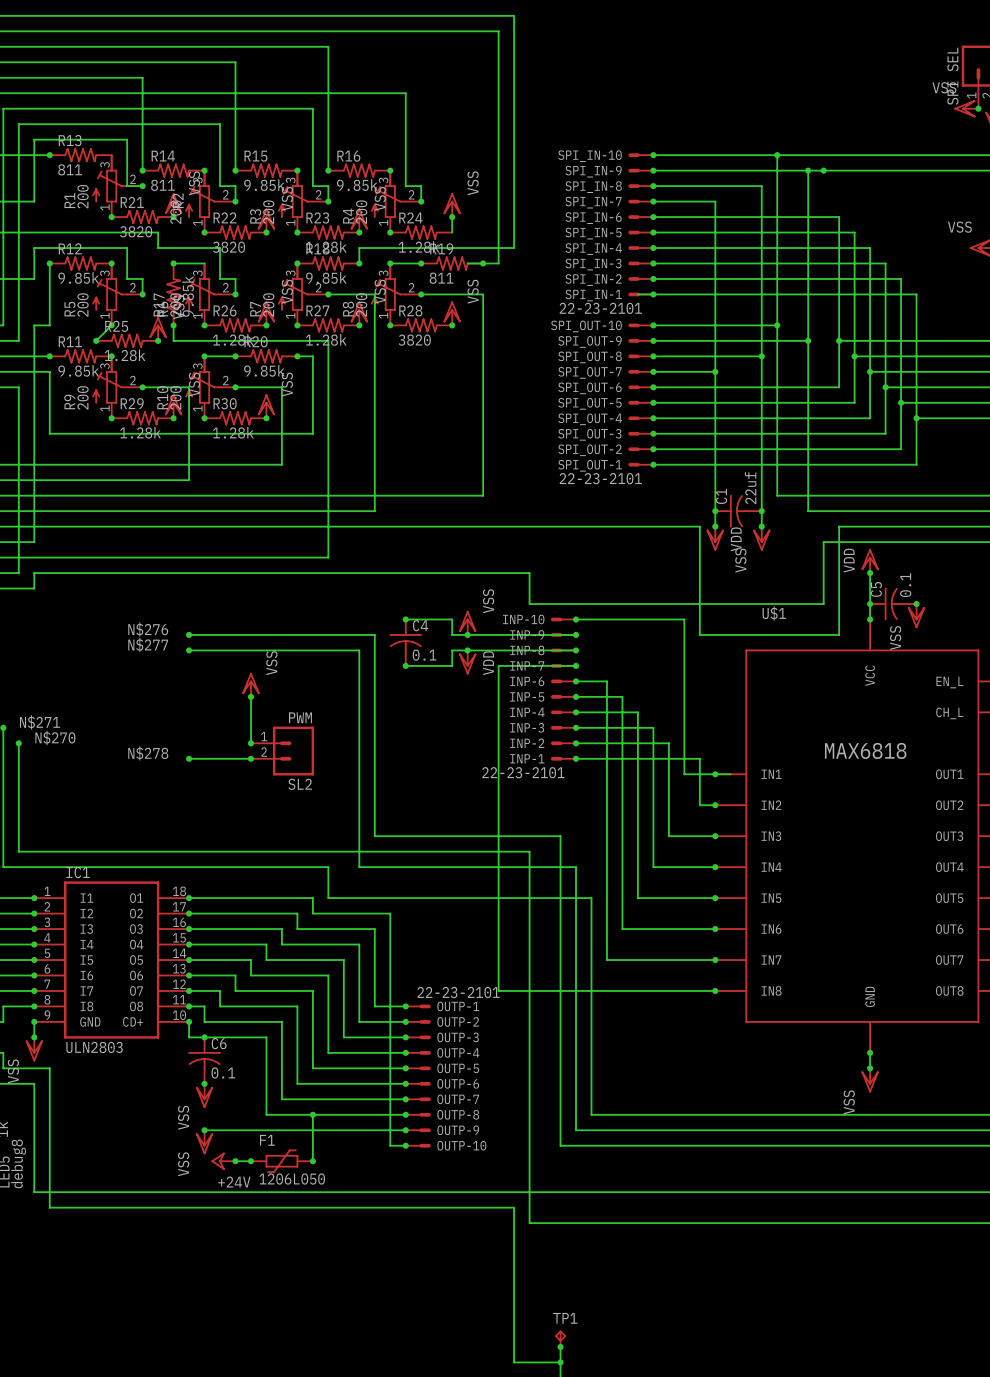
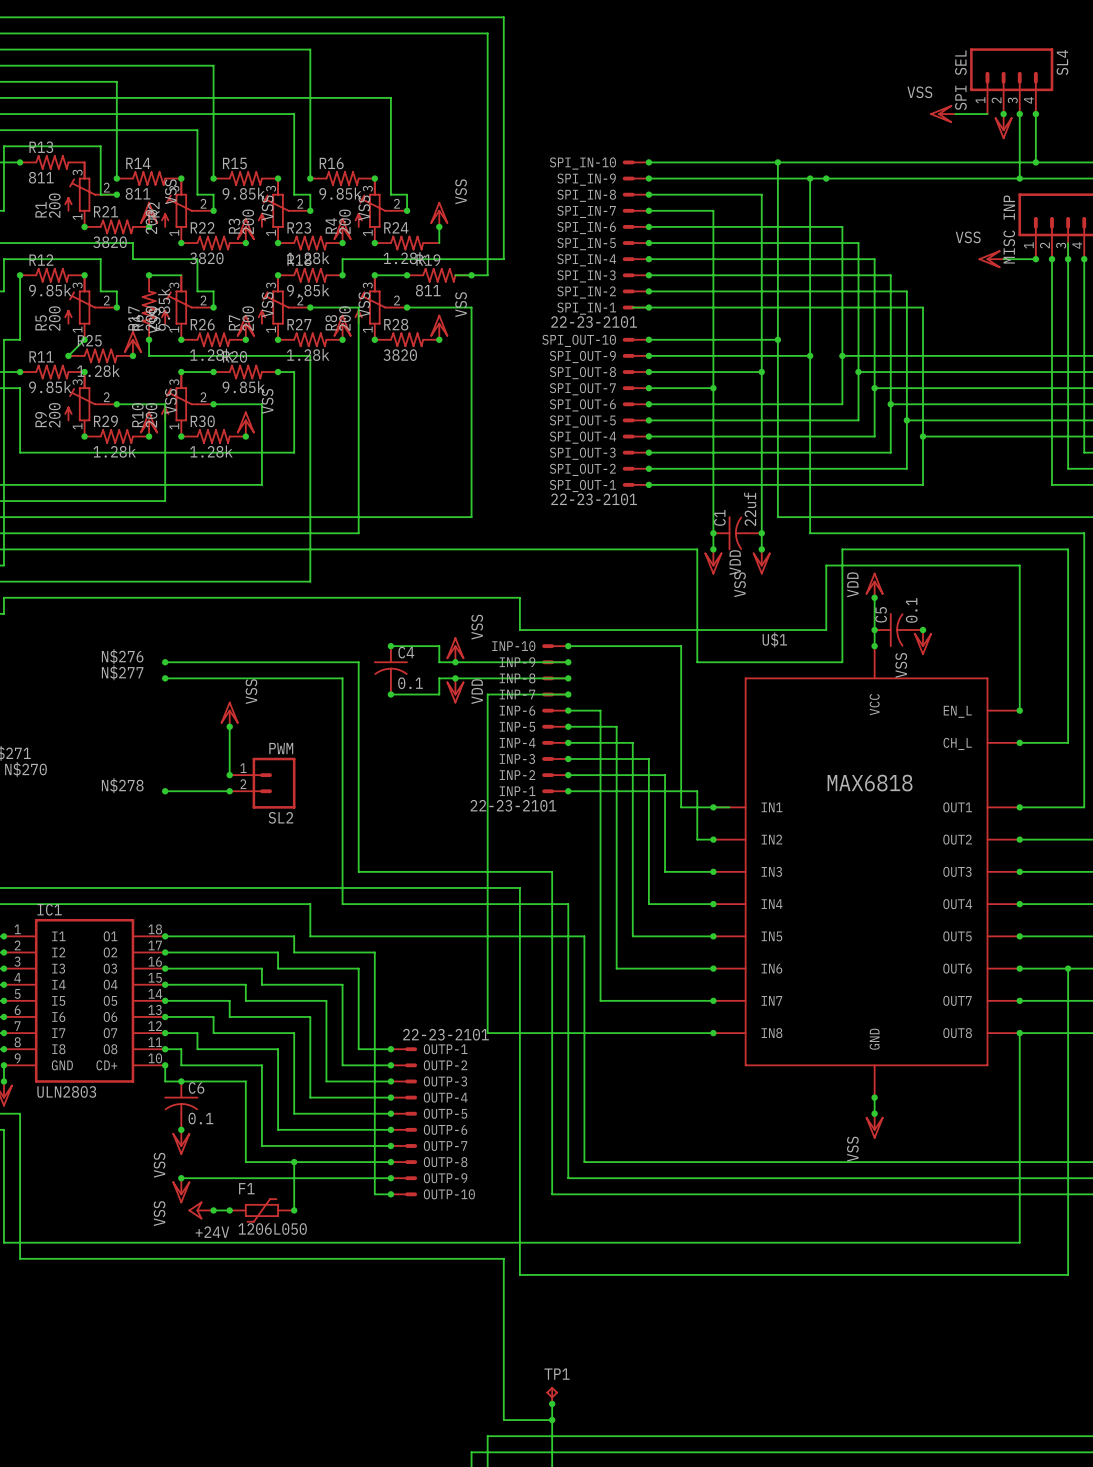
power symbol position: VSS (966, 108) -> VSS (942, 114)
junction: (978, 108) -> none

